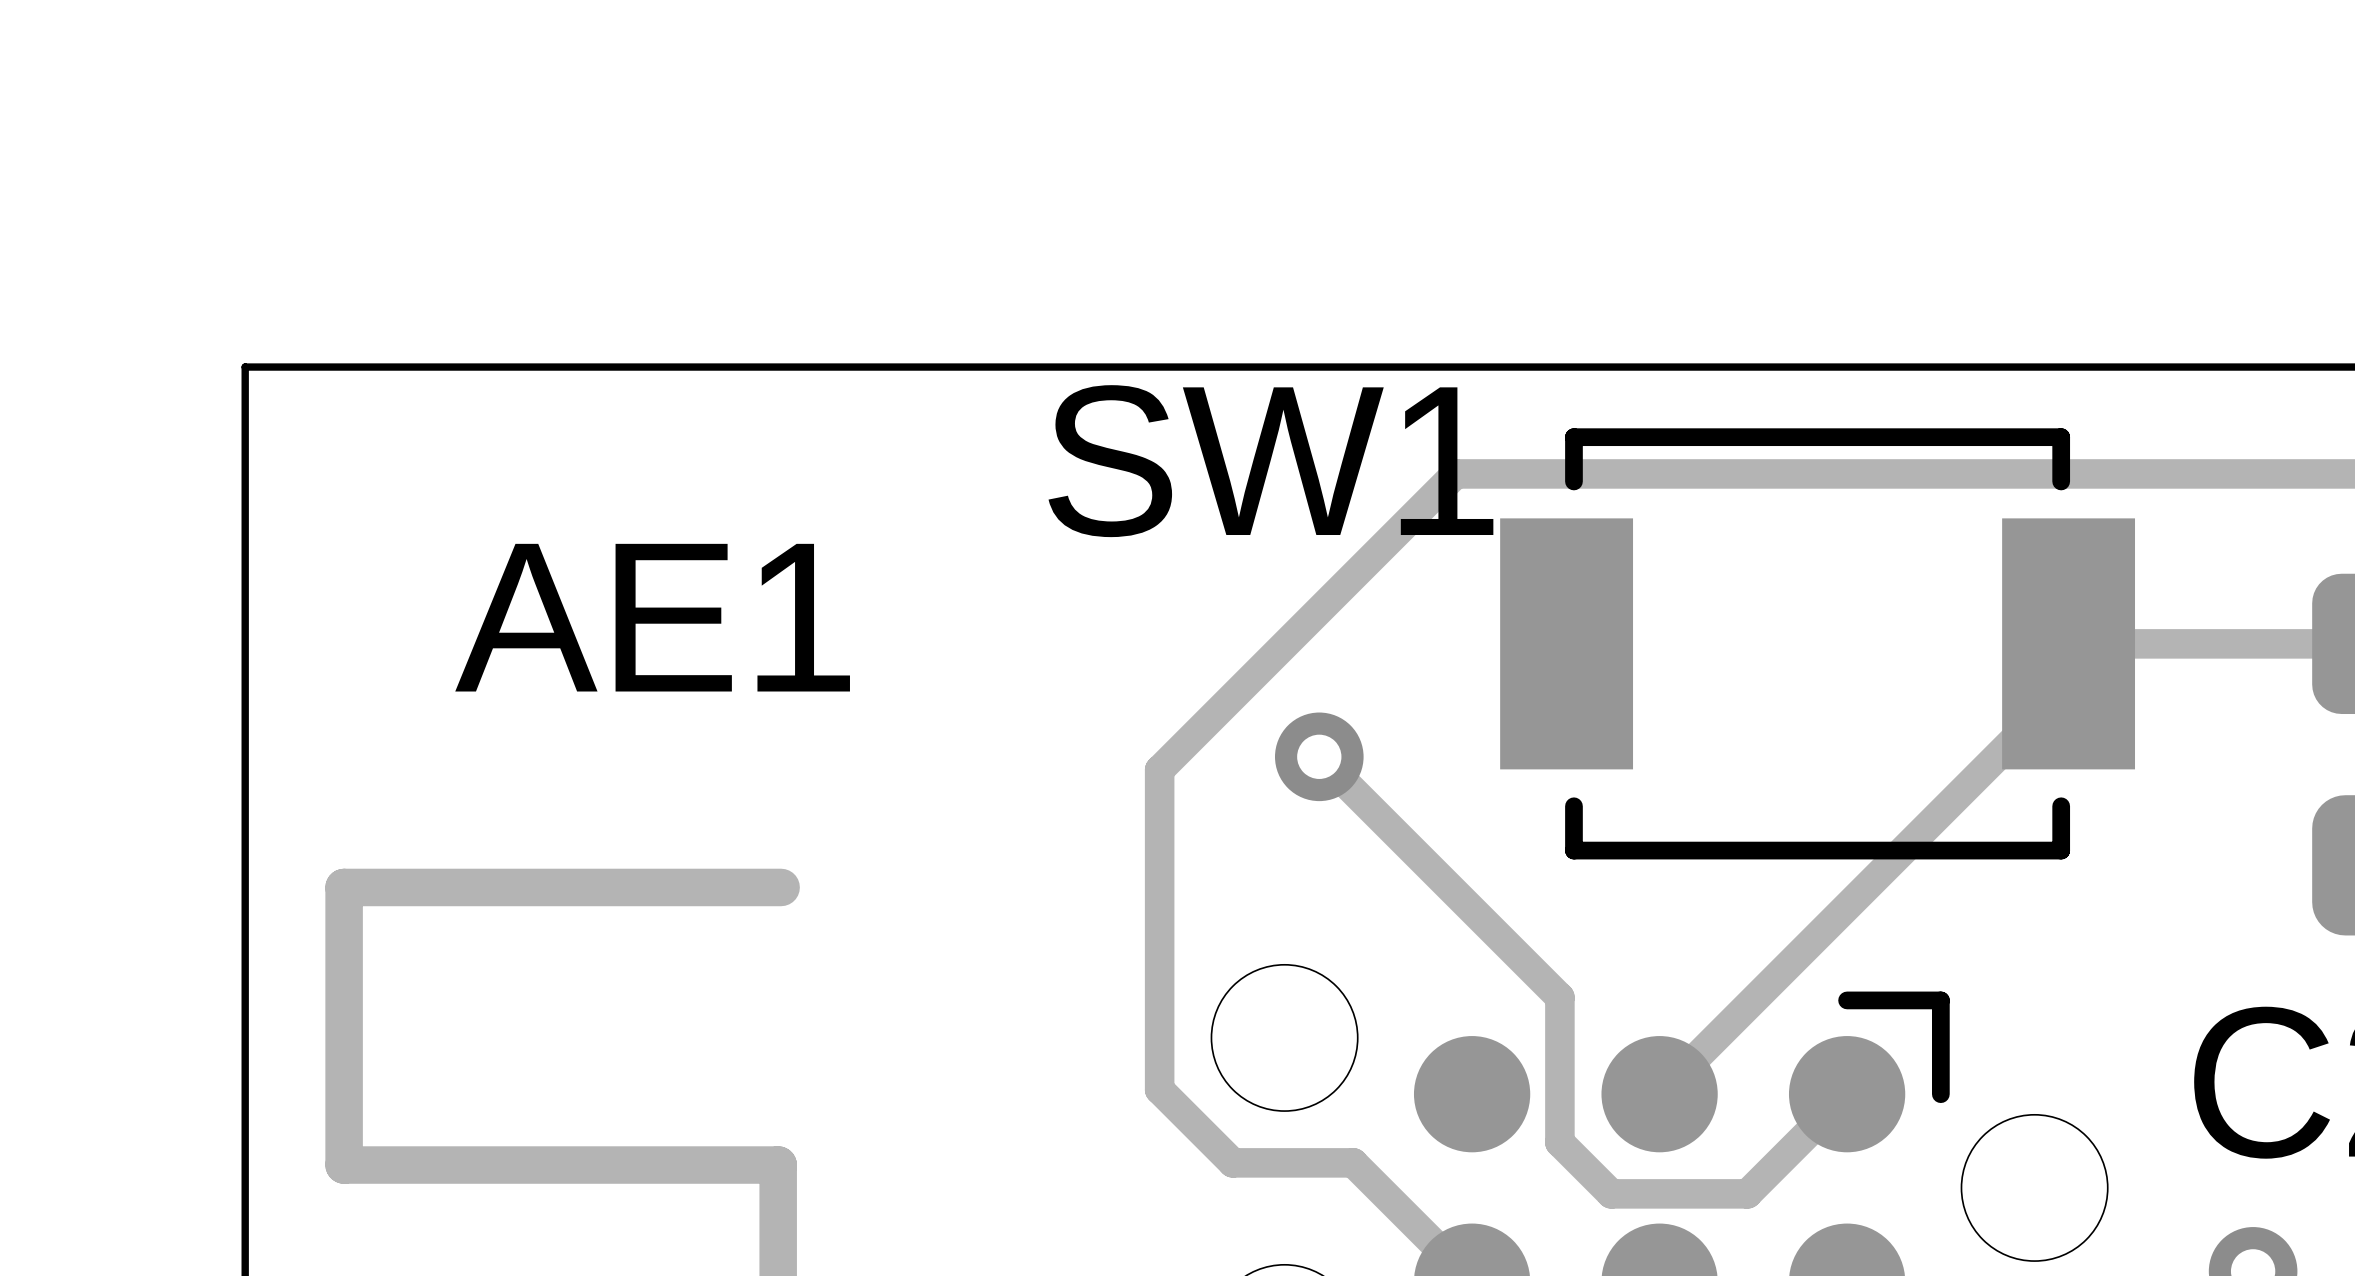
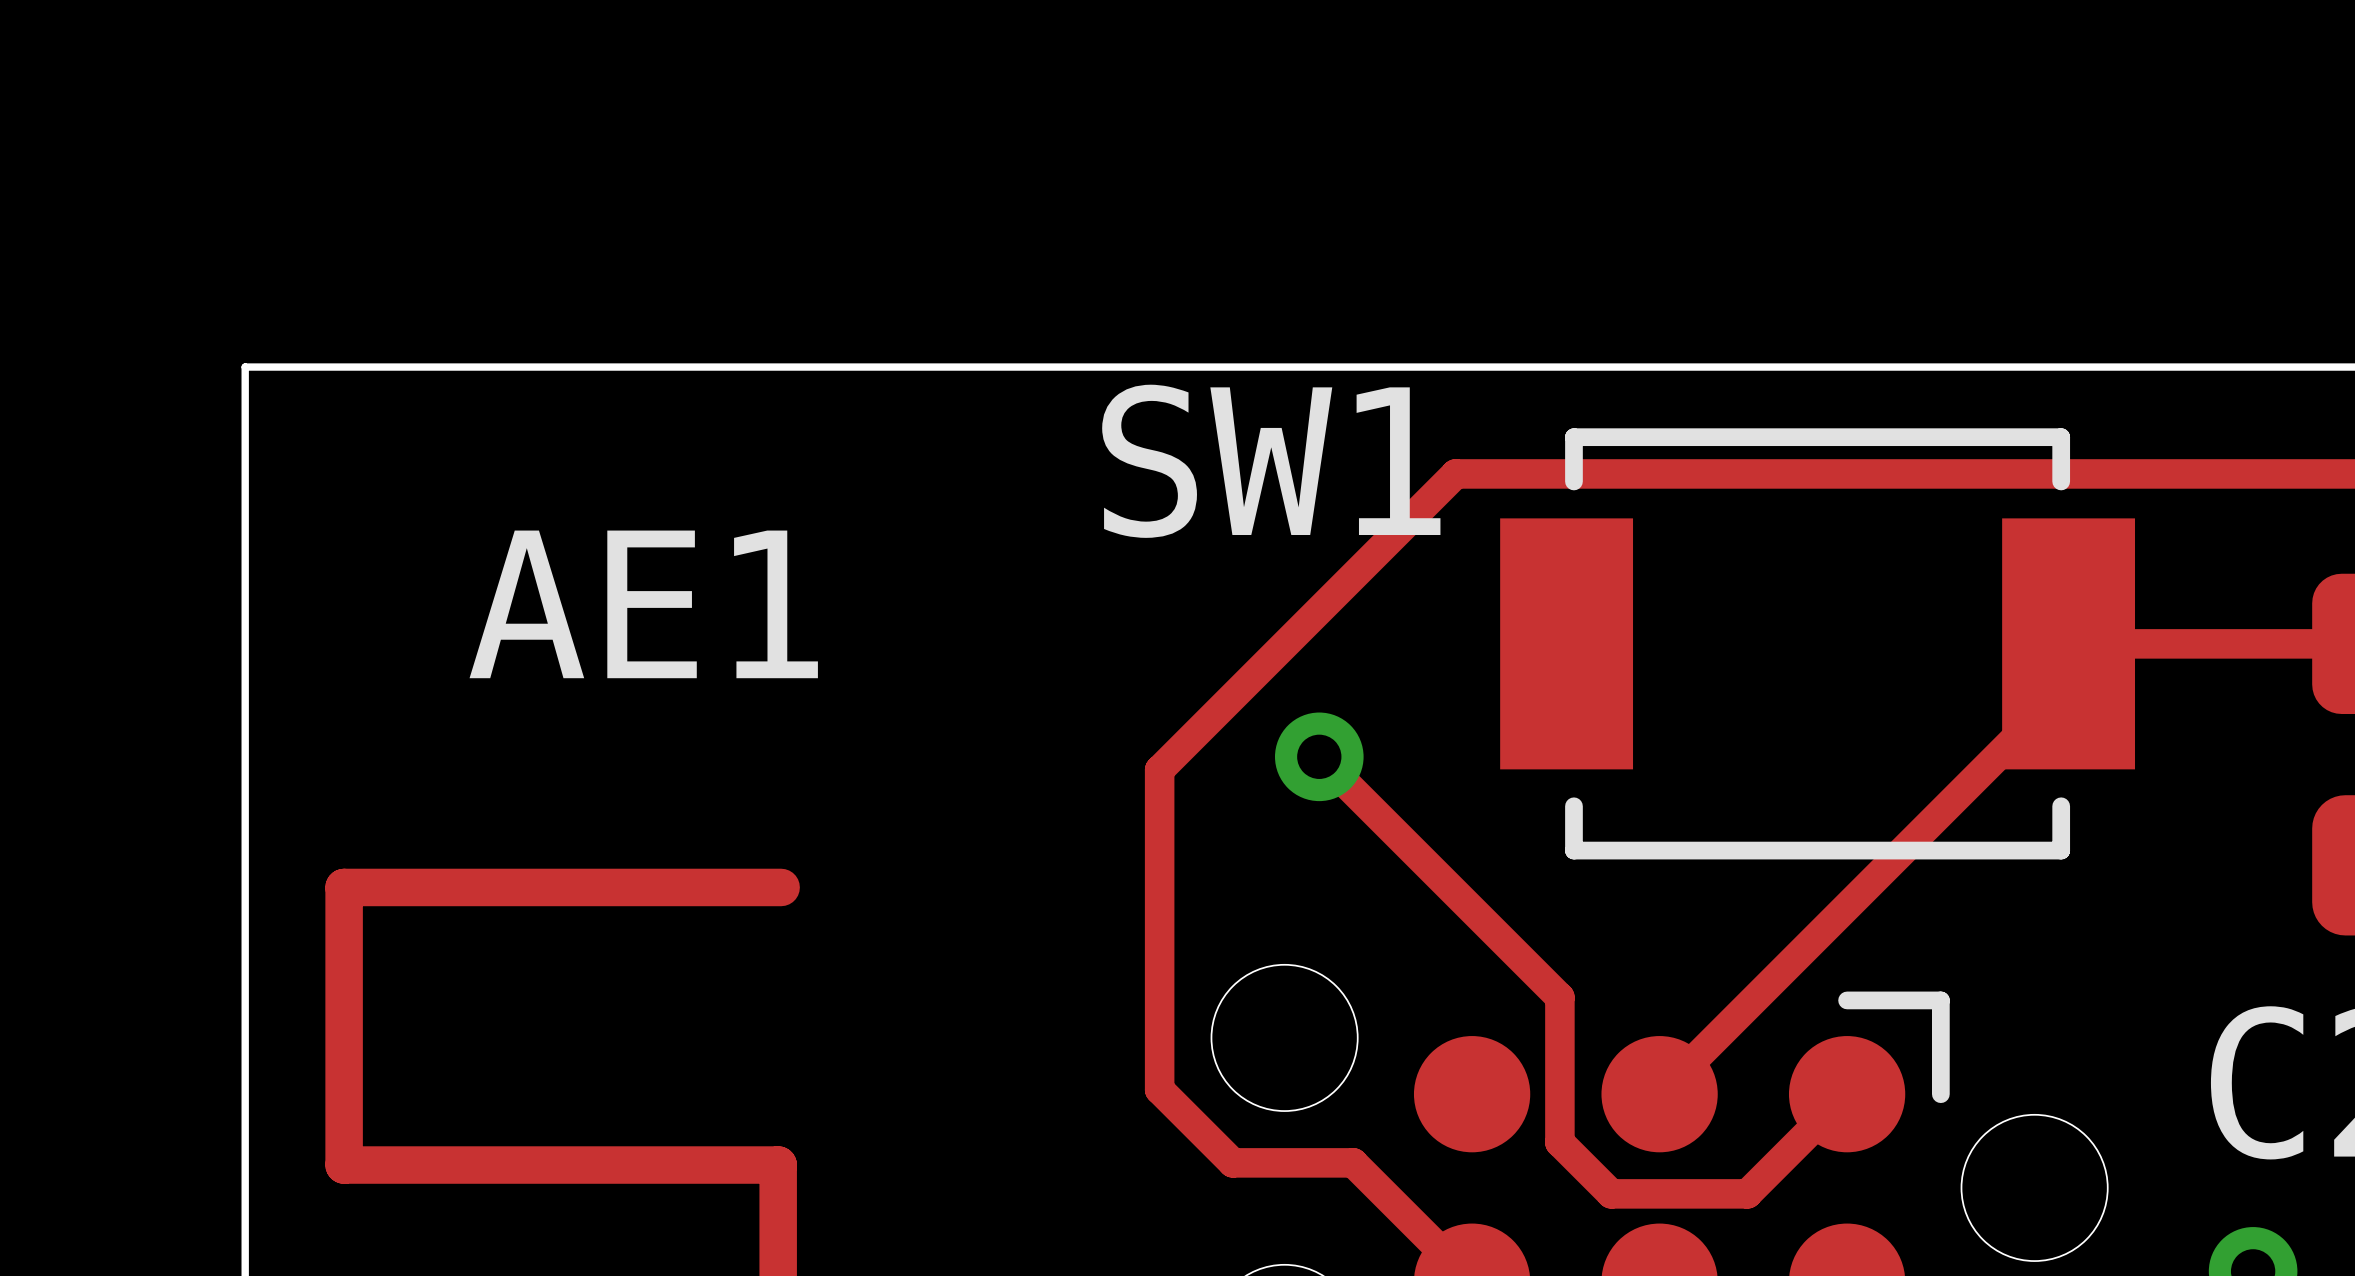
AE1 name position: AE1 (652, 617) -> AE1 (643, 604)

